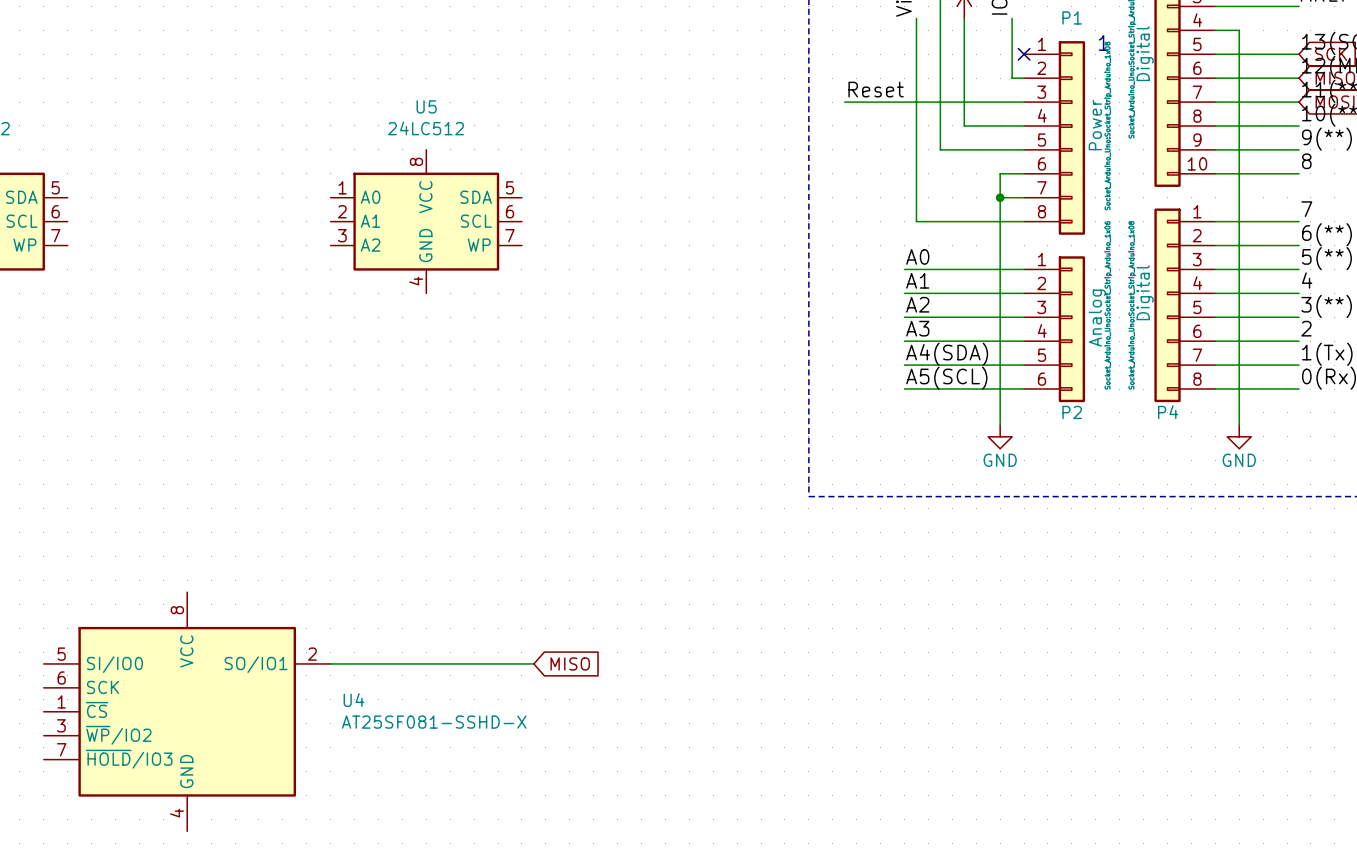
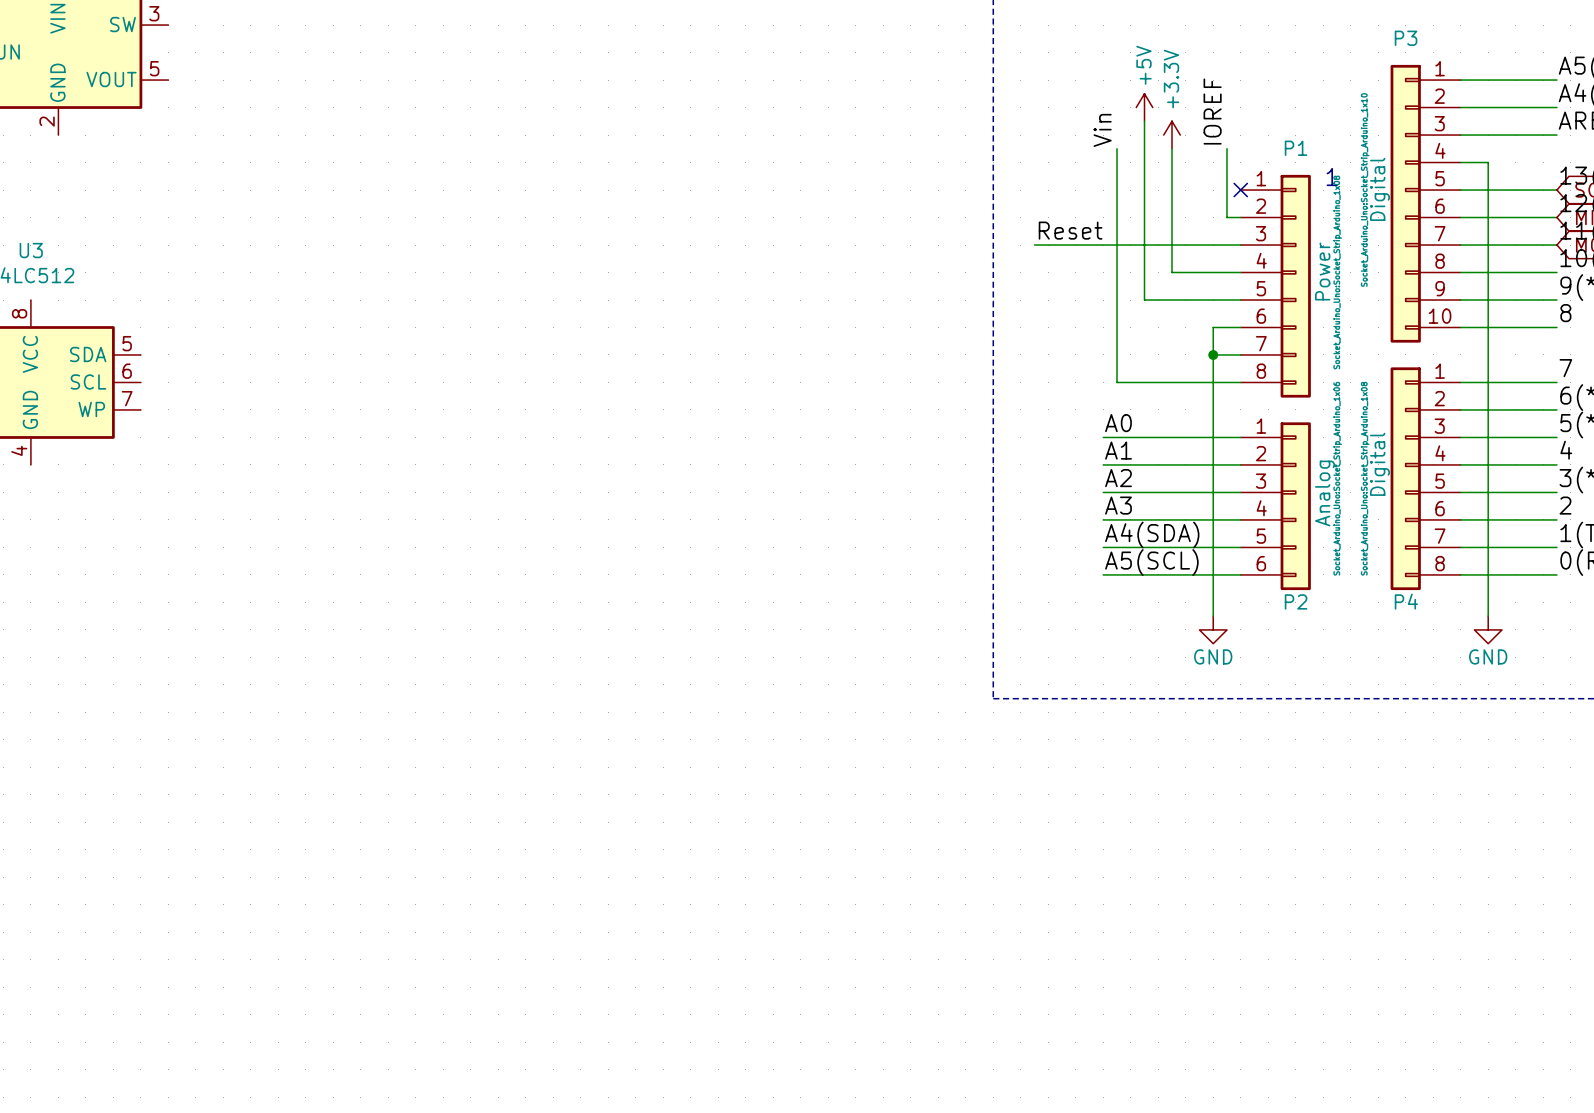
U5: 24LC512 (426, 221) -> none
wire: (330, 663) (533, 663) -> none
global label: MISO (570, 663) -> none
U4: AT25SF081-SSHD-X (187, 711) -> none

